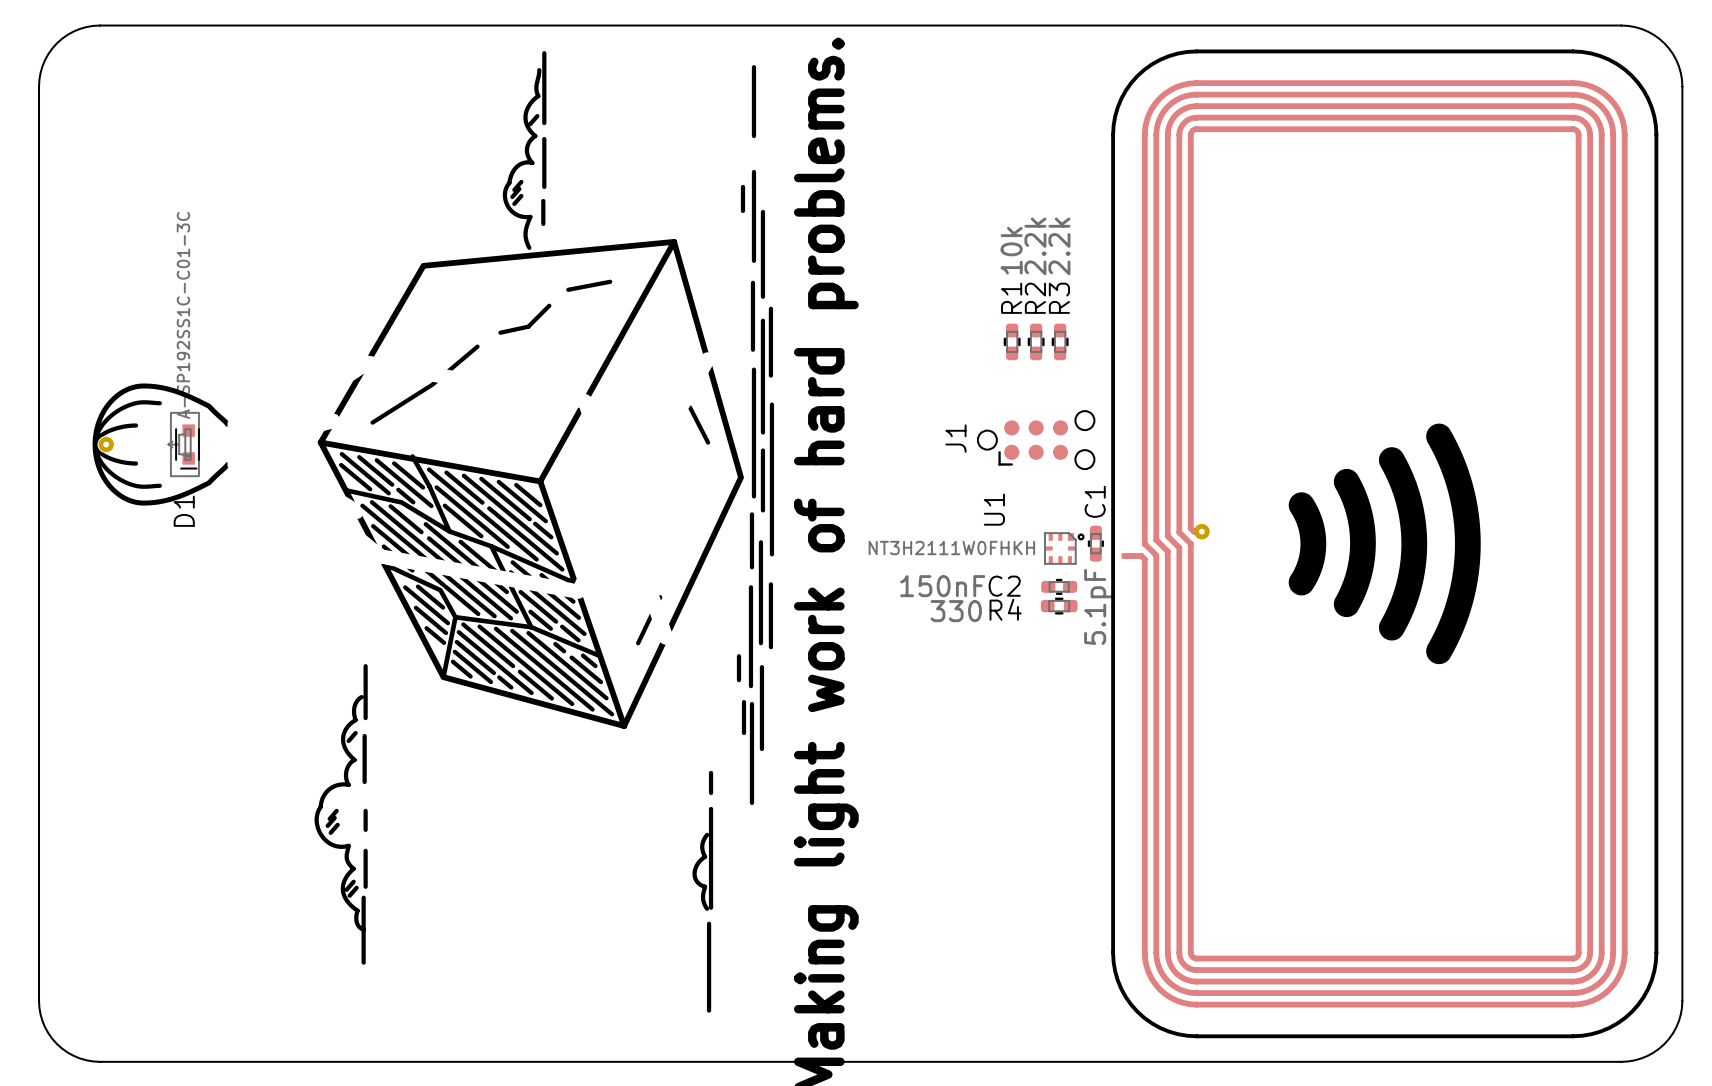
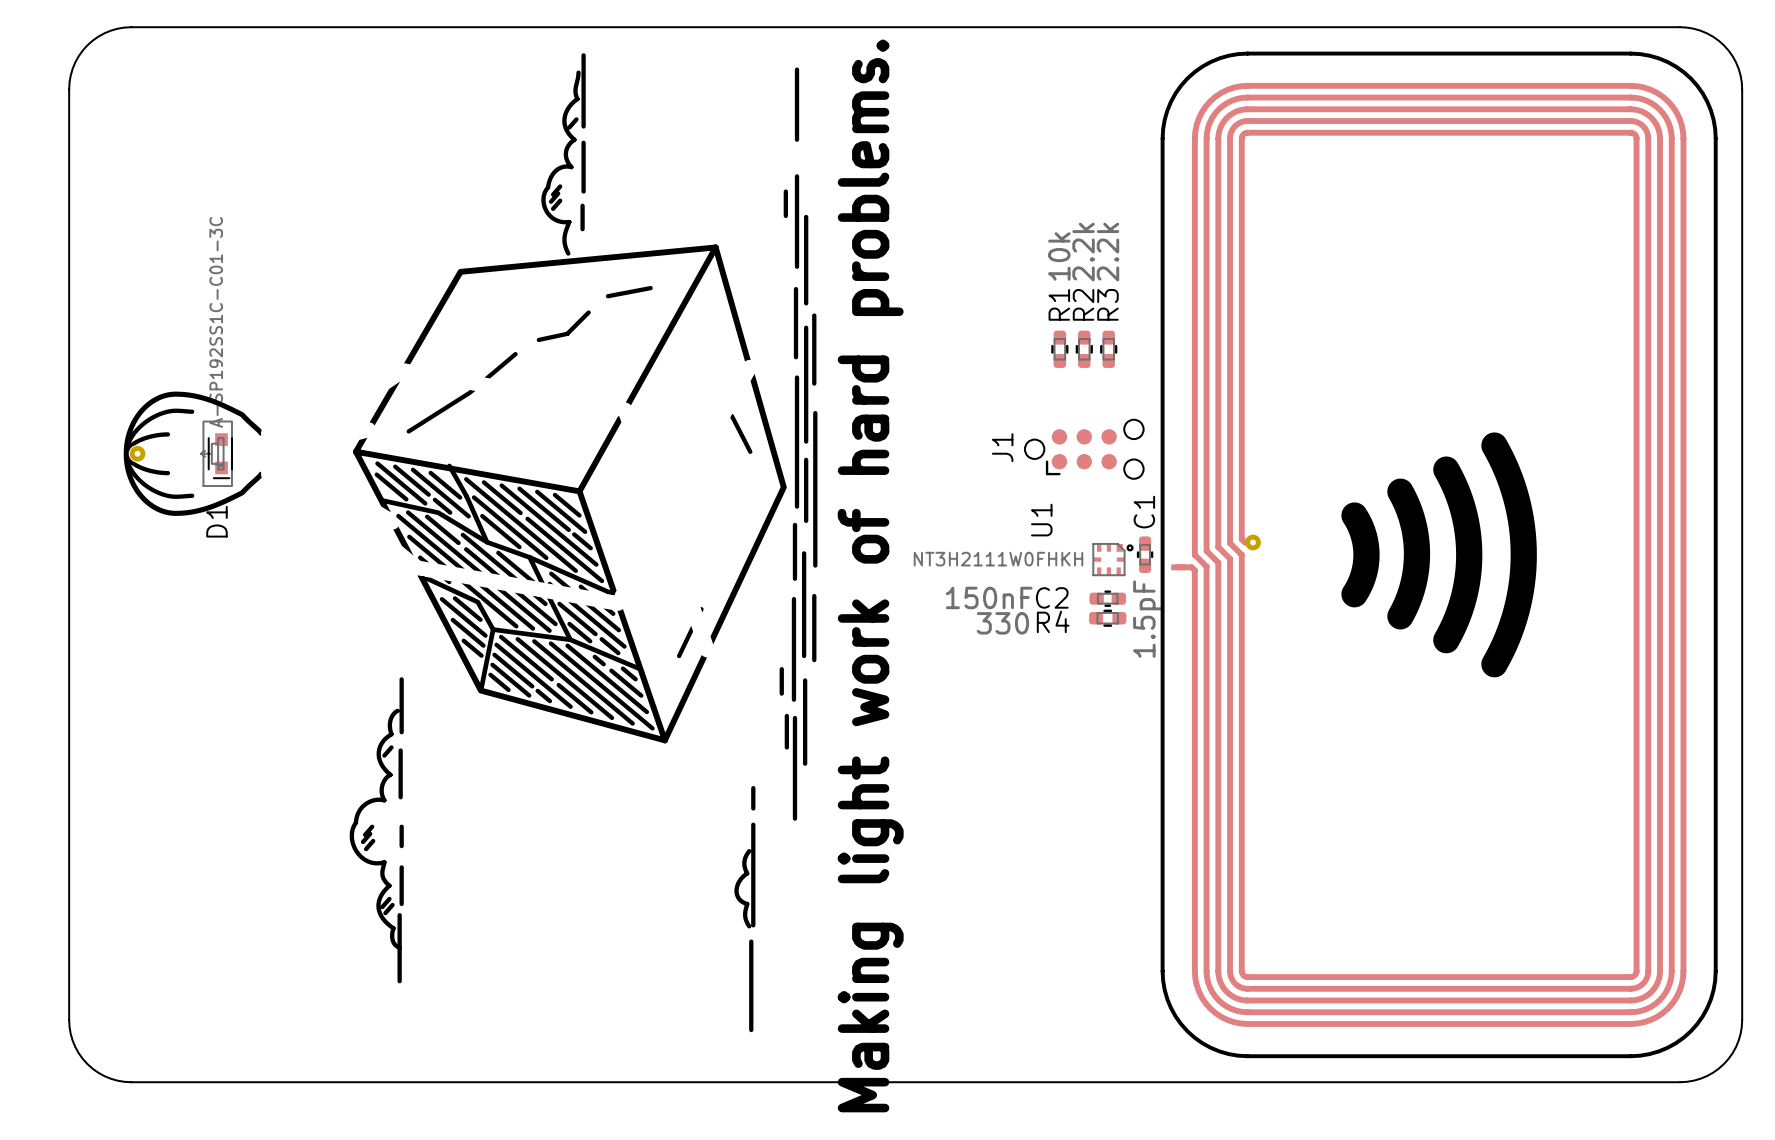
C1 value: 5.1pF (1098, 606) -> 1.5pF (1147, 619)

